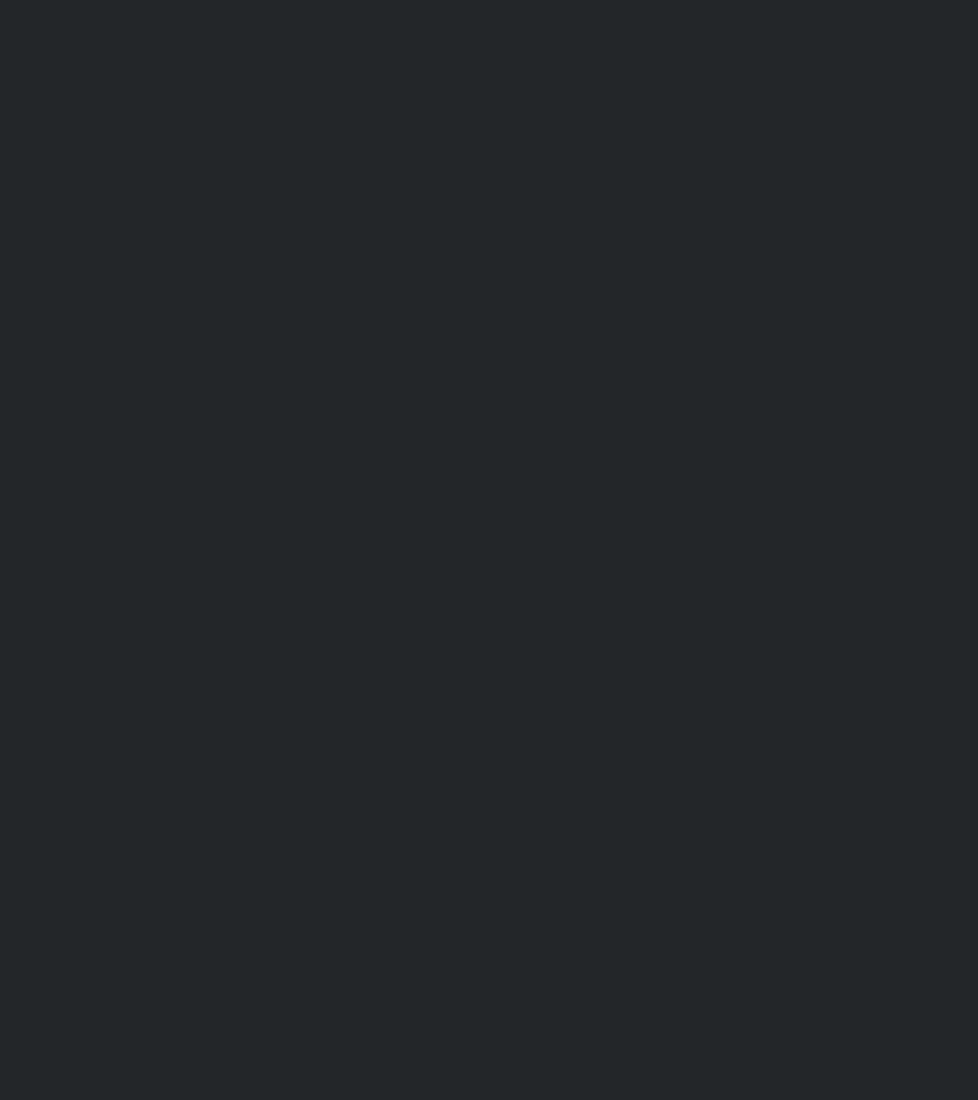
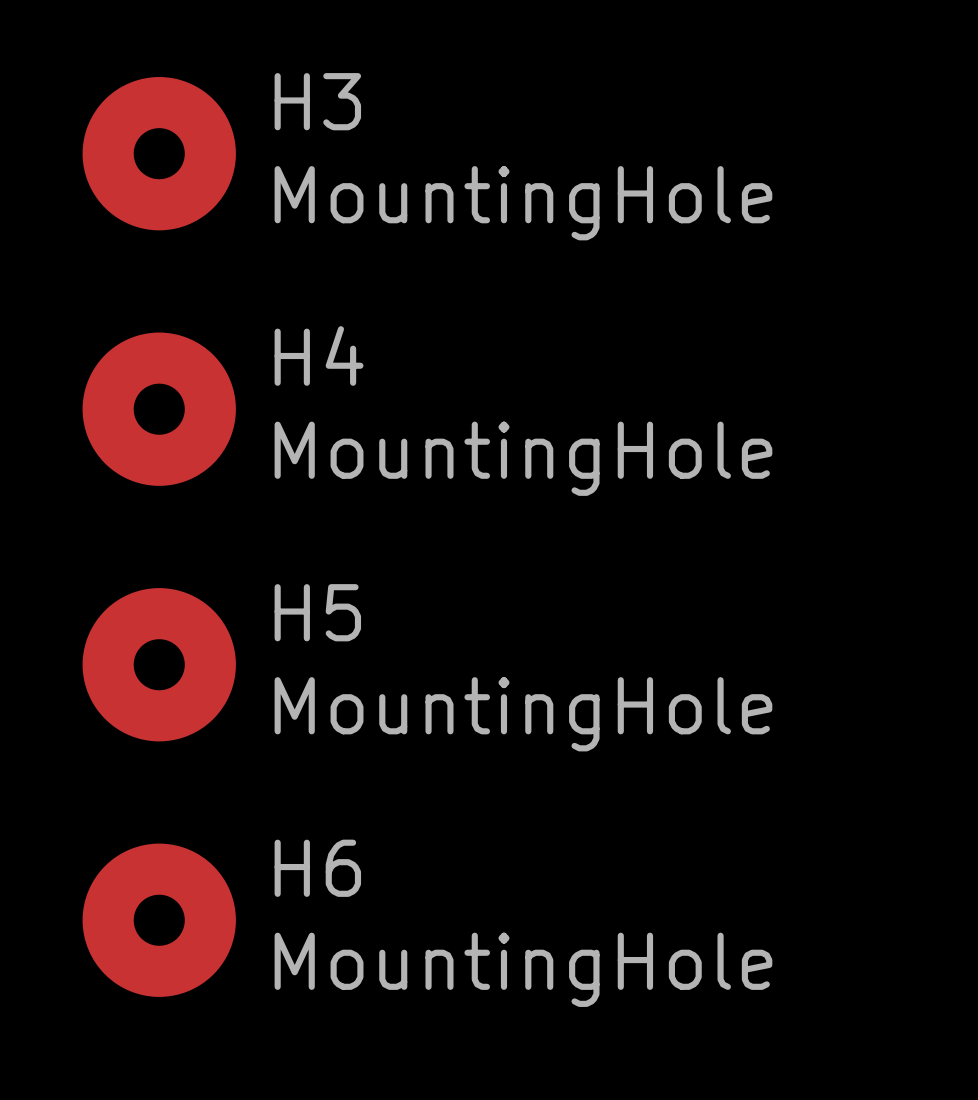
H3: none -> MountingHole (159, 153)
H4: none -> MountingHole (159, 409)
H5: none -> MountingHole (159, 664)
H6: none -> MountingHole (159, 920)

